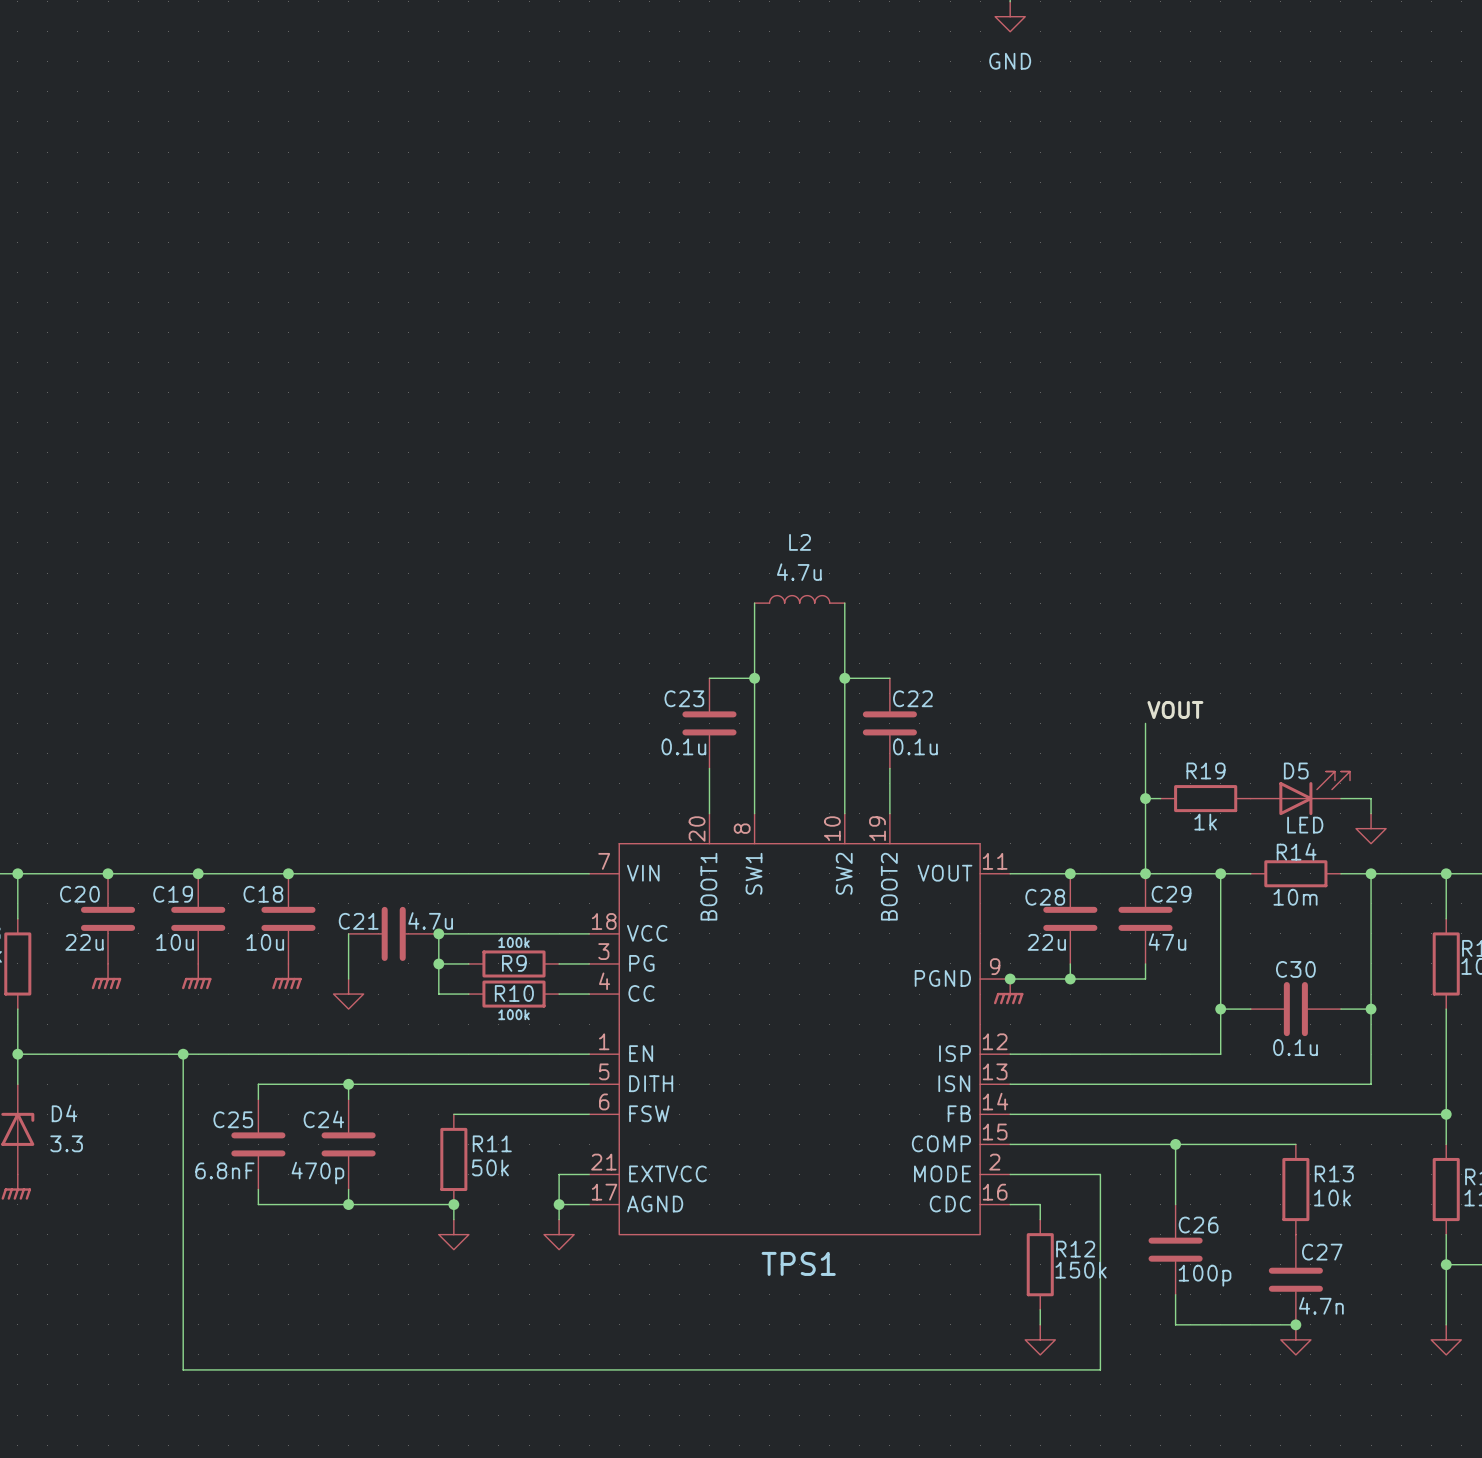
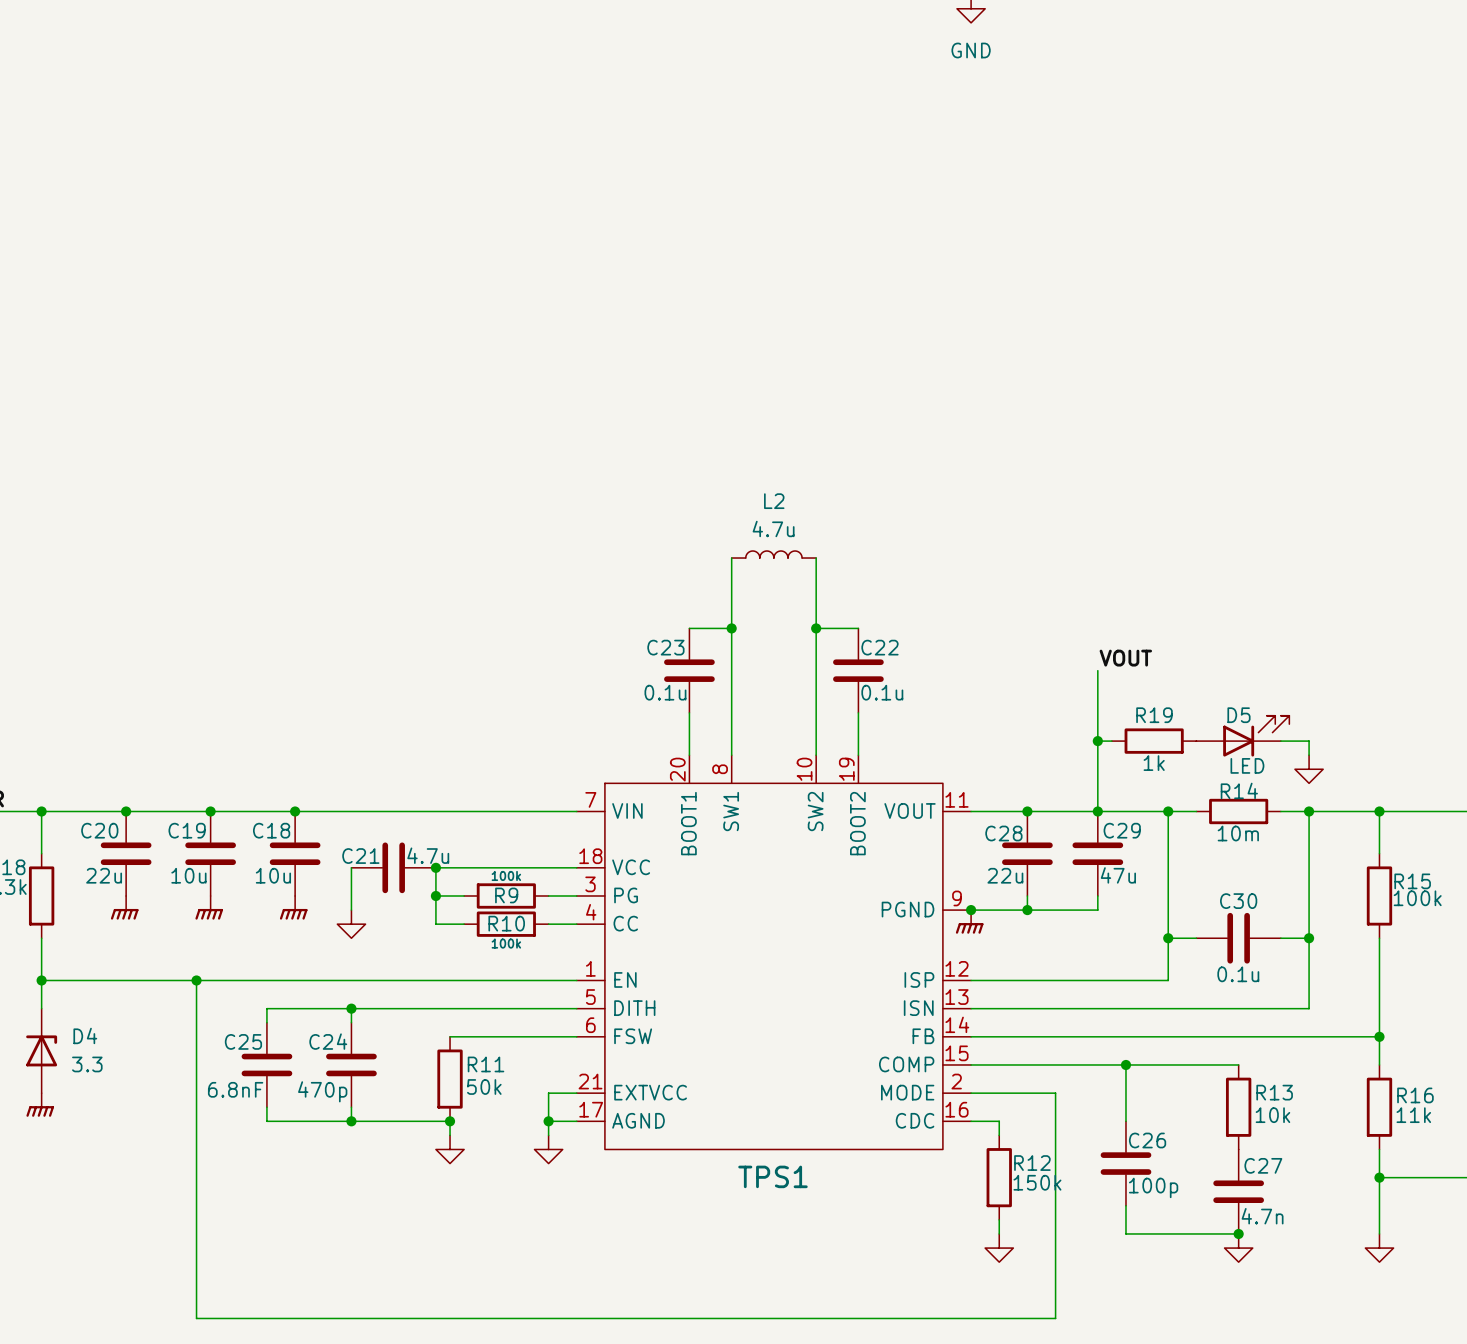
wire: (183, 1369) (1100, 1369) -> (196, 1276) (196, 1318) (1055, 1318) (1055, 1276)

